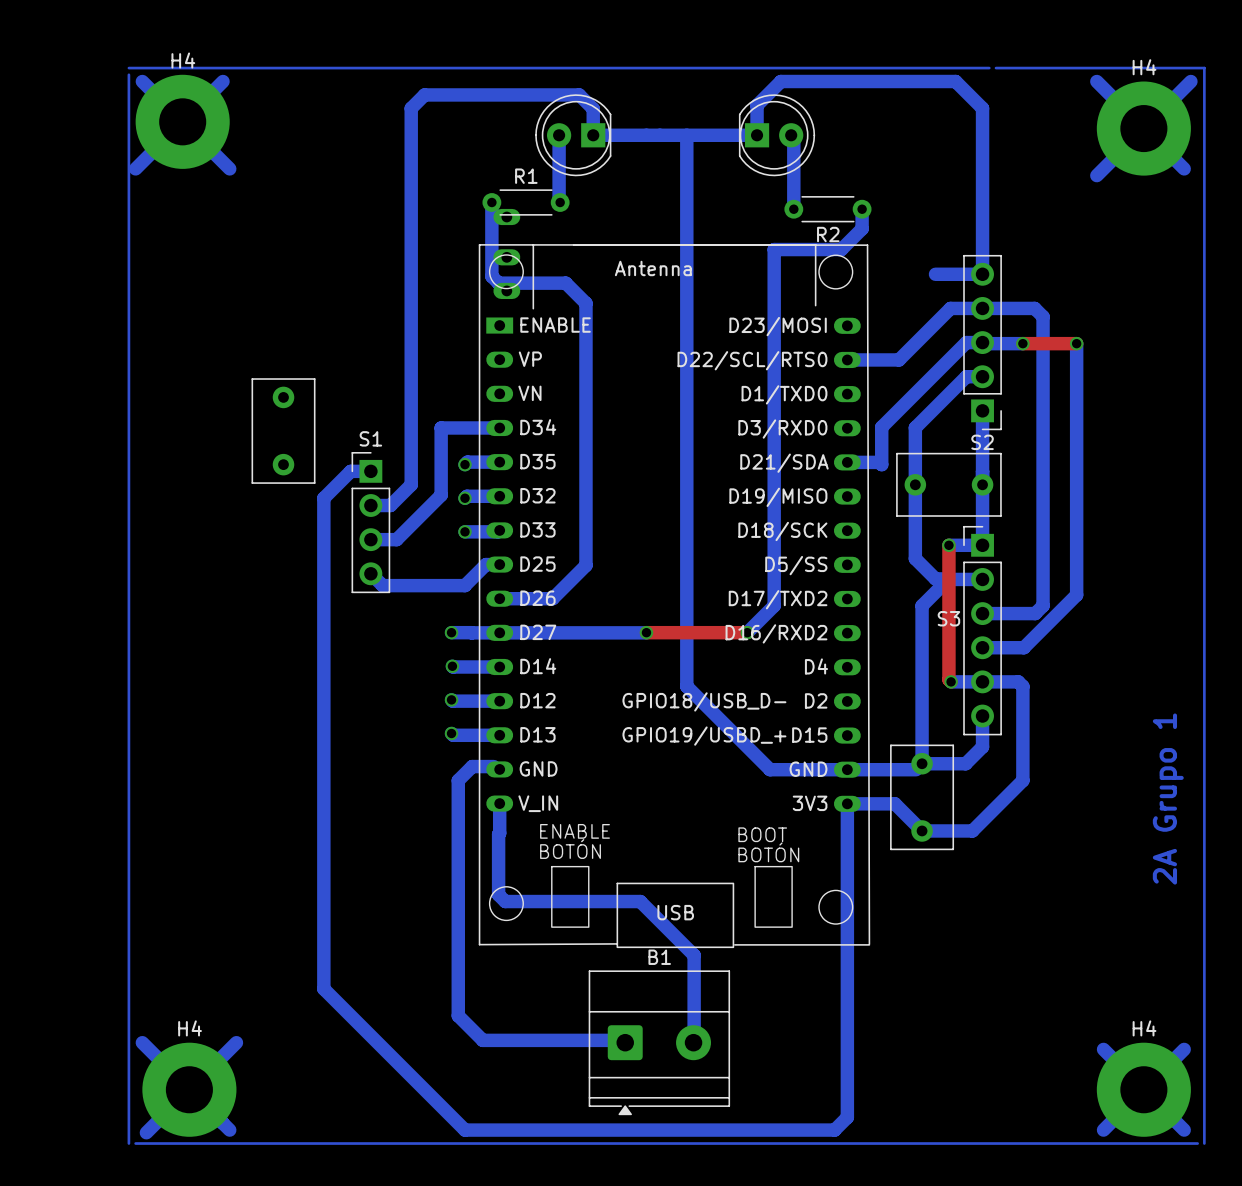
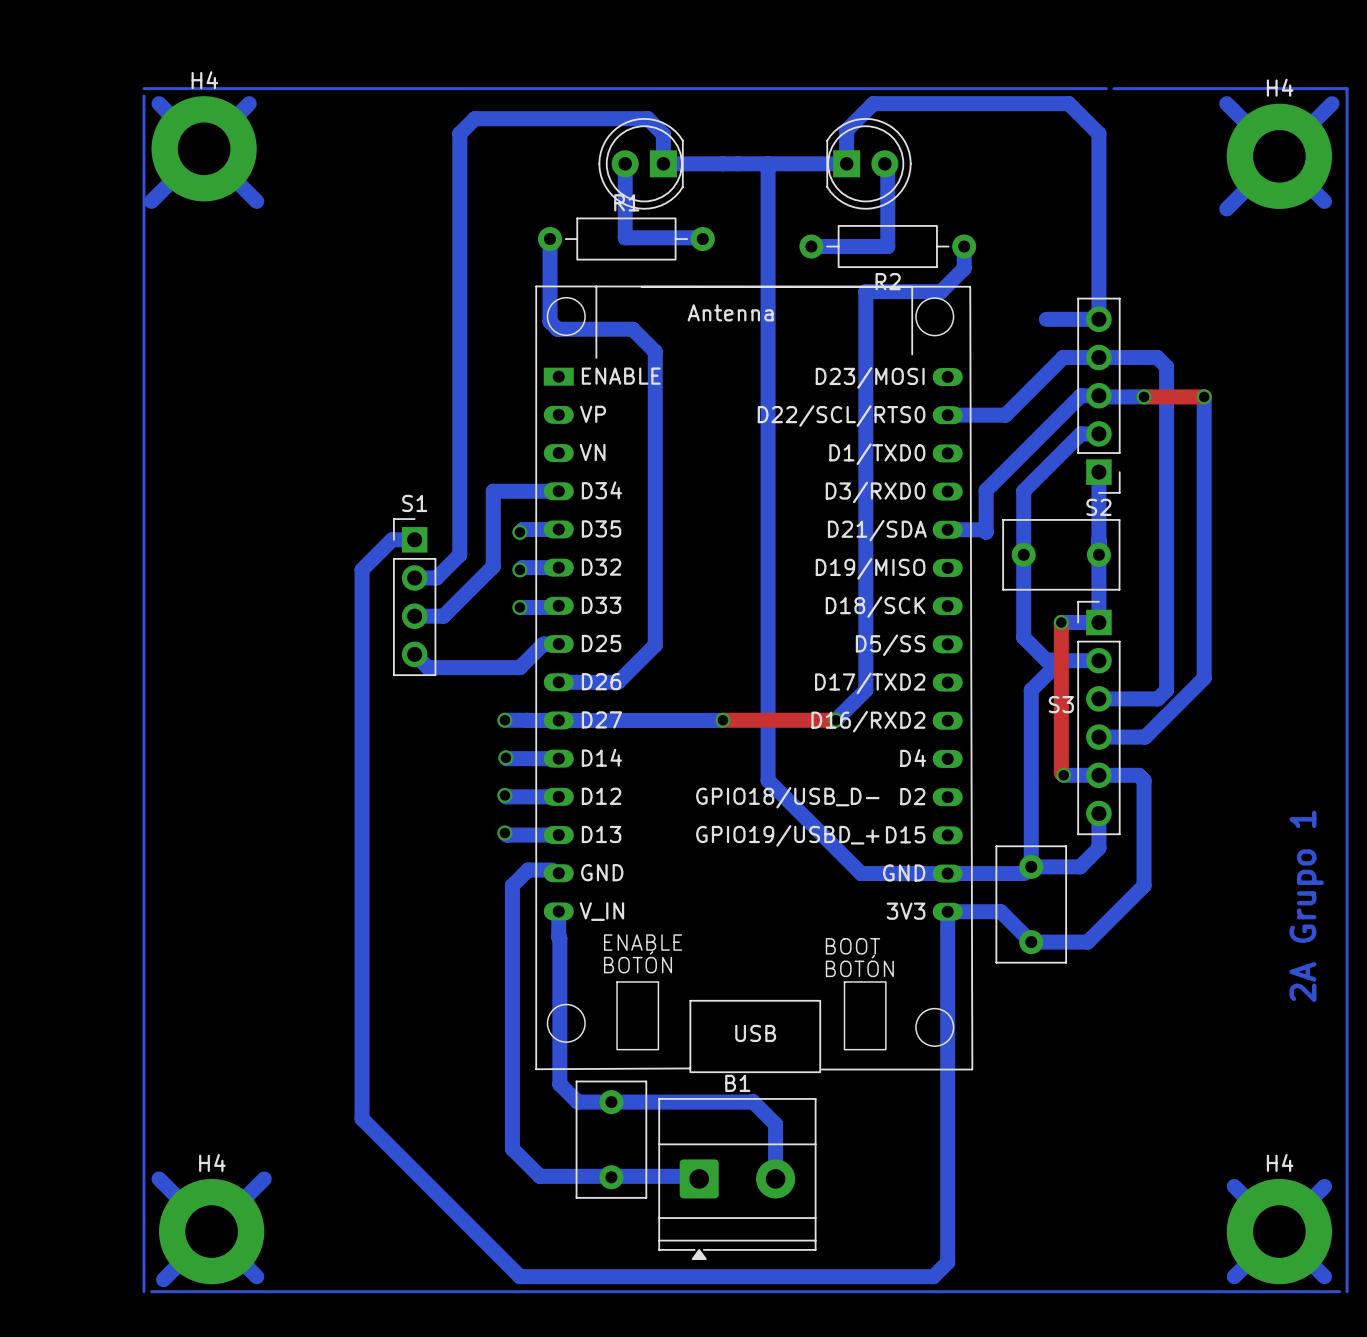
R1 footprint: [482, 189, 570, 216] -> [537, 217, 715, 261]
R2 footprint: [784, 196, 872, 223] -> [799, 225, 977, 269]
bottom track: none -> (625, 237) (702, 239)
bottom track: none -> (811, 246) (887, 246)
part: (506, 217) -> none
part: (506, 257) -> none
part: (506, 290) -> none
part: (283, 431) -> none
bottom track: (499, 826) (498, 894) (505, 901) (640, 901) (694, 955) (694, 1040) -> (558, 937) (559, 1084) (577, 1102) (752, 1101) (775, 1124) (775, 1178)
part: none -> (611, 1139)

